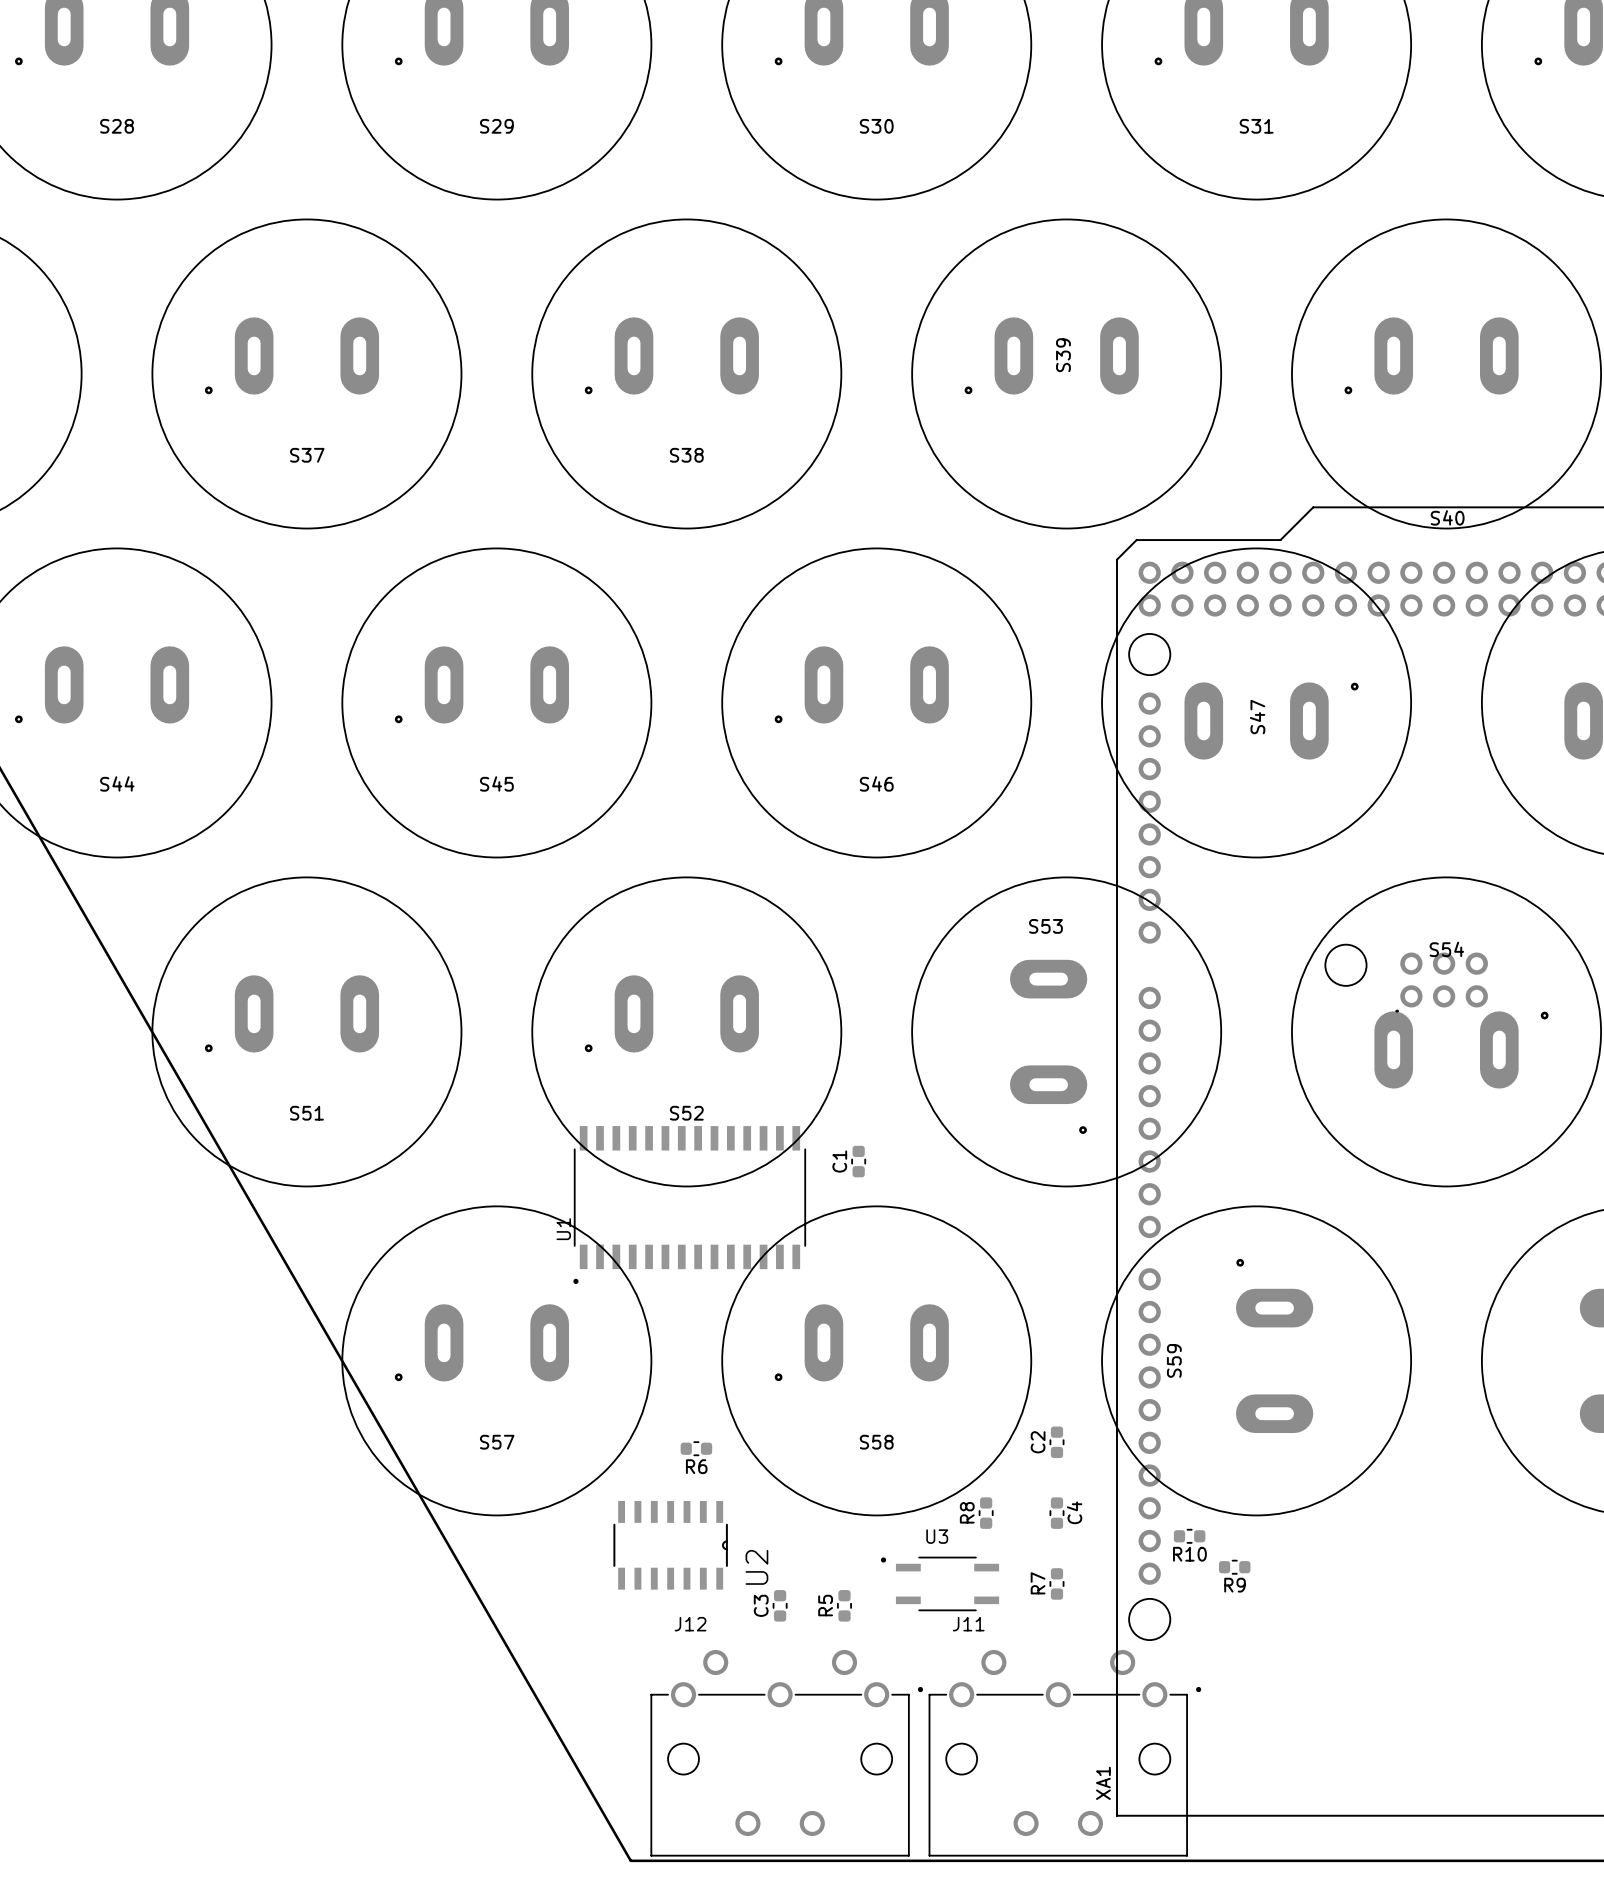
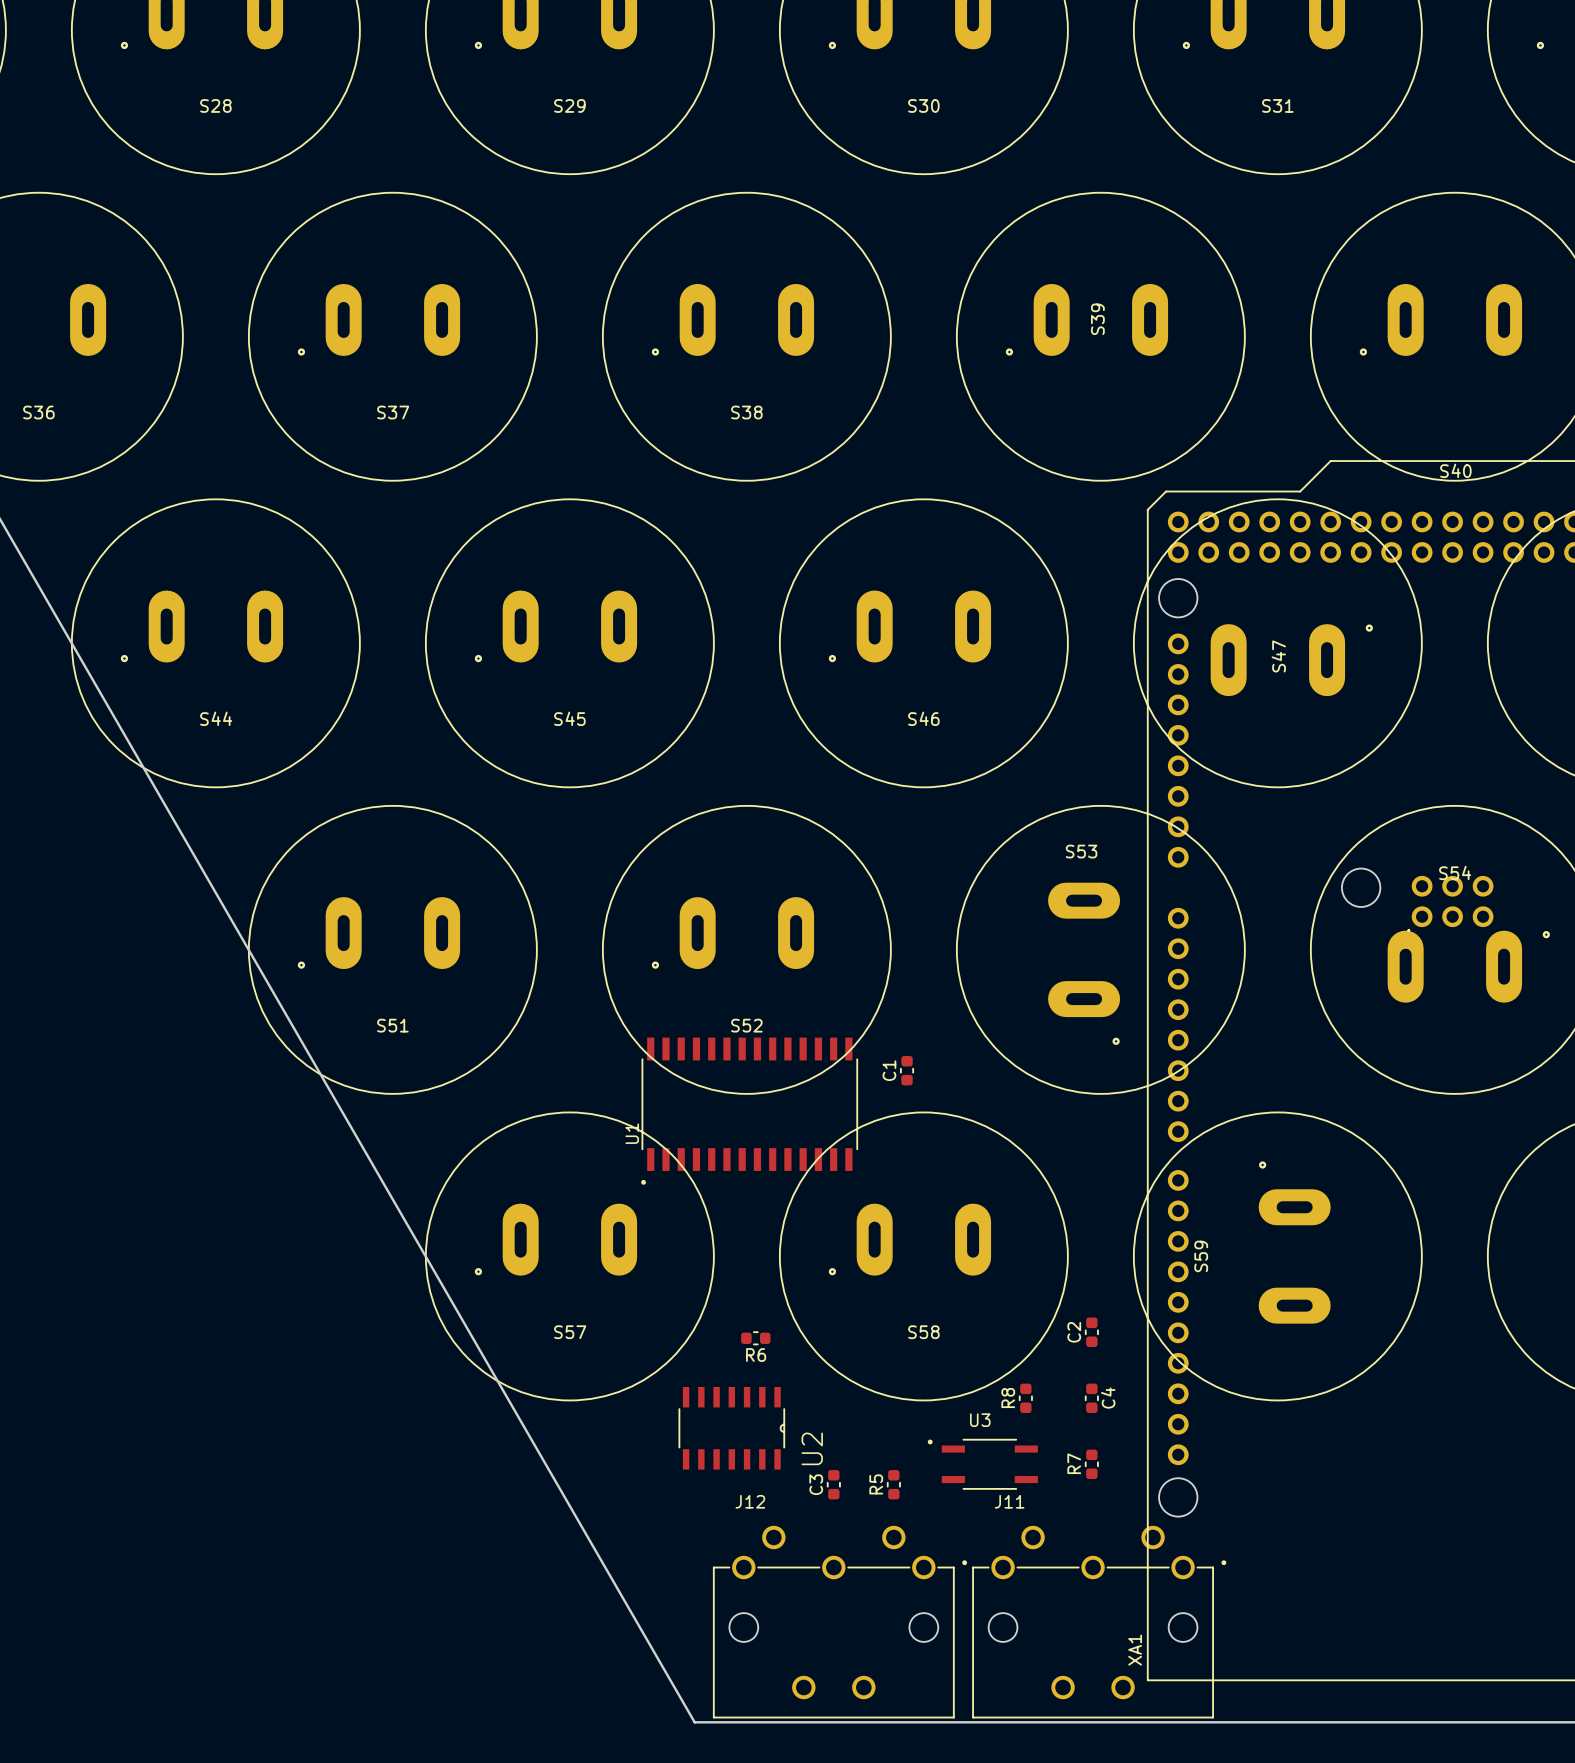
R10: (1189, 1536) -> none
R9: (1234, 1567) -> none

